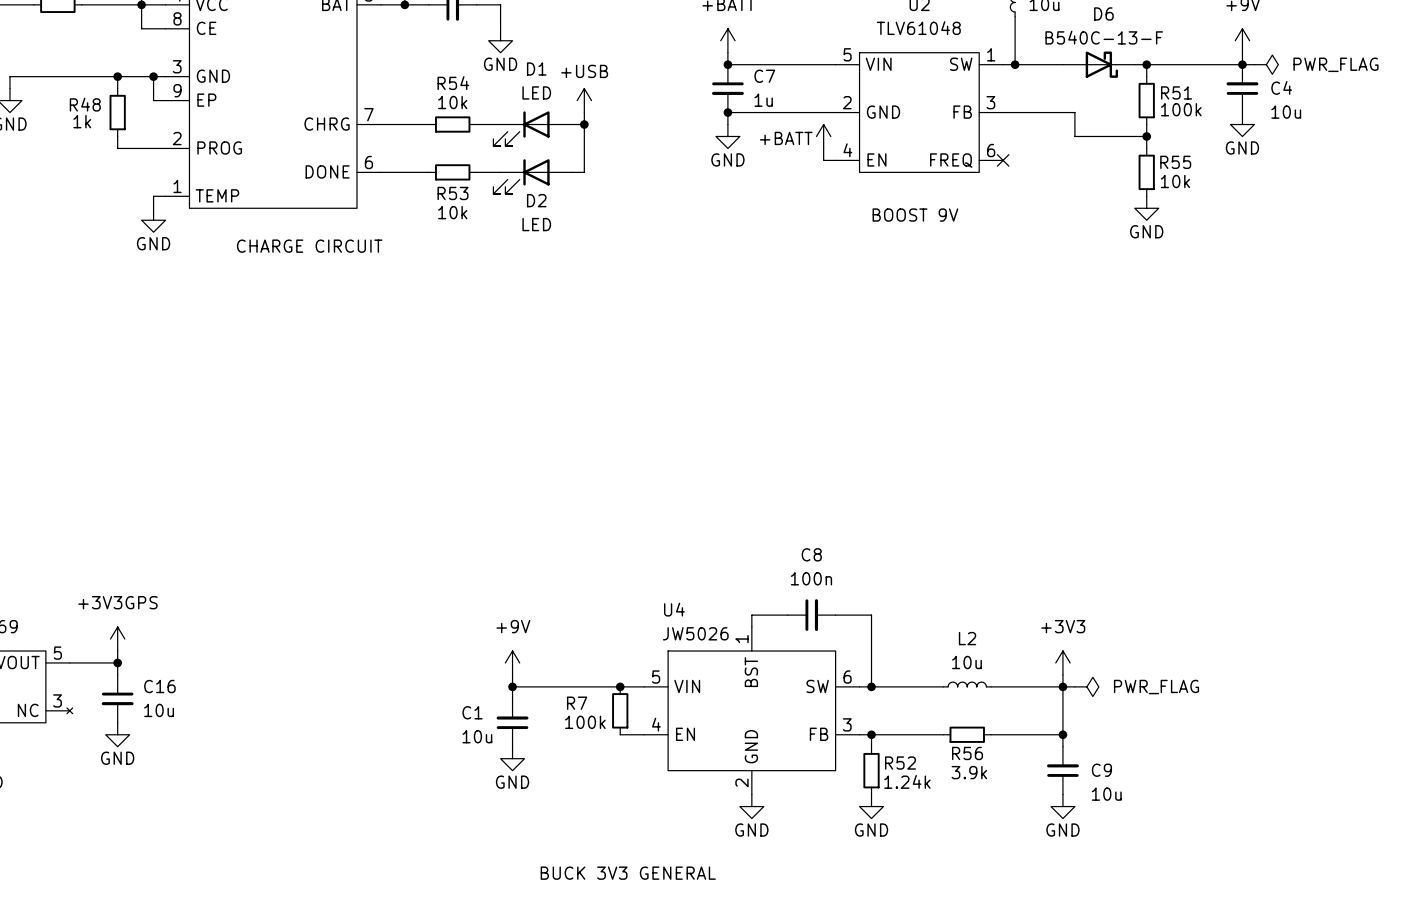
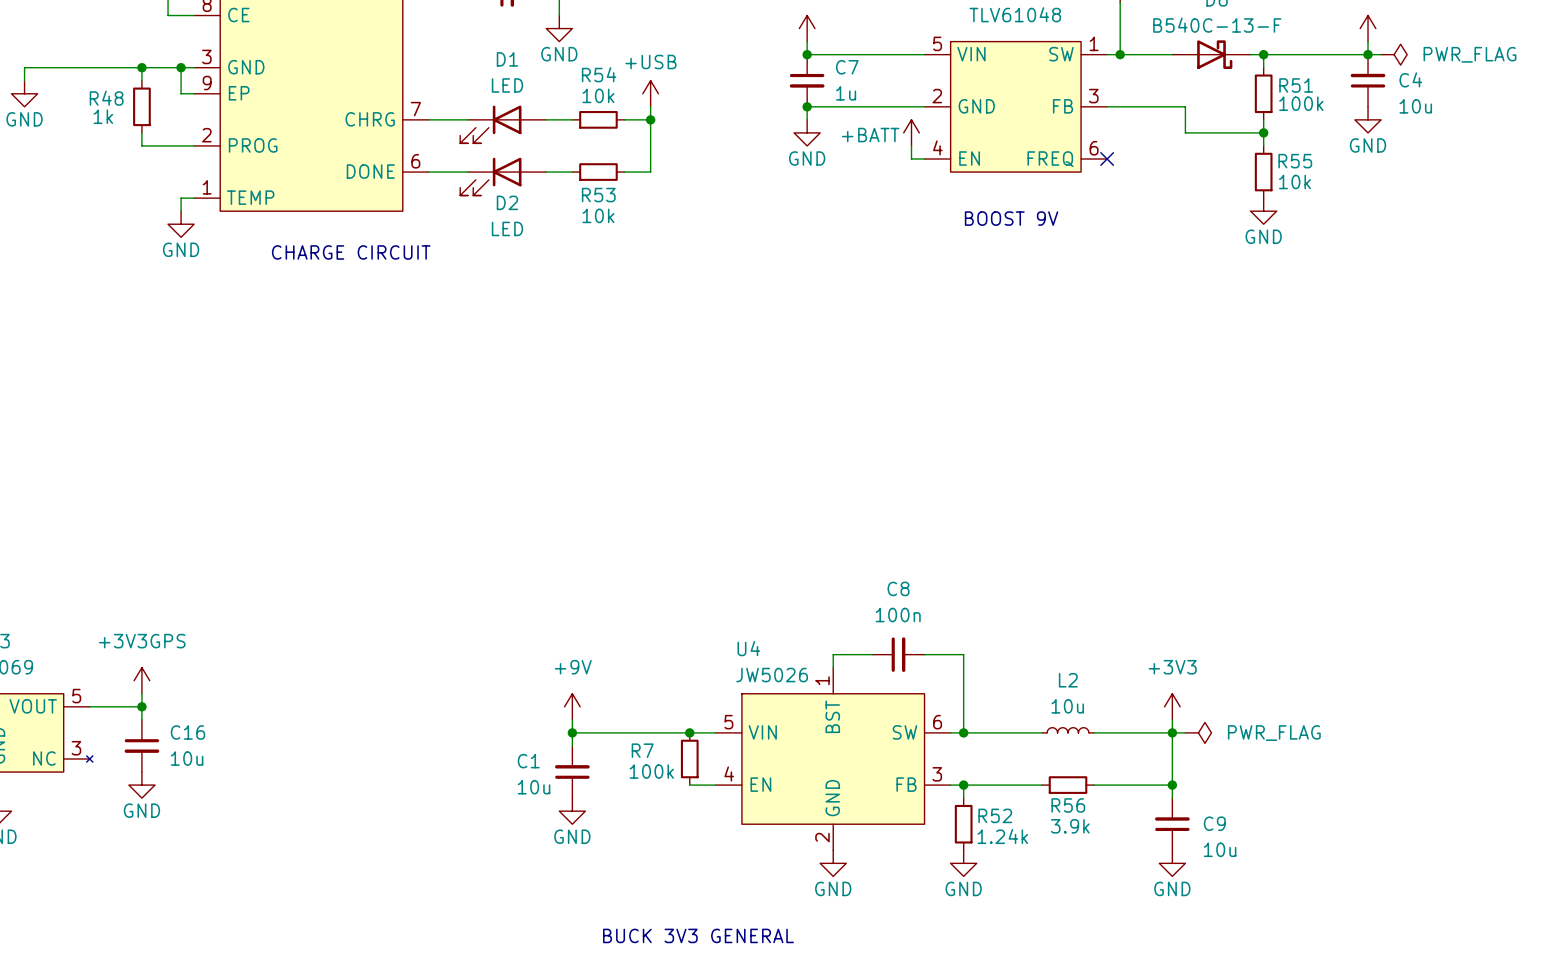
R54 position: (452, 124) -> (598, 119)
D1 position: (532, 128) -> (503, 124)
R53 position: (452, 172) -> (598, 172)
D2 position: (532, 176) -> (503, 176)

